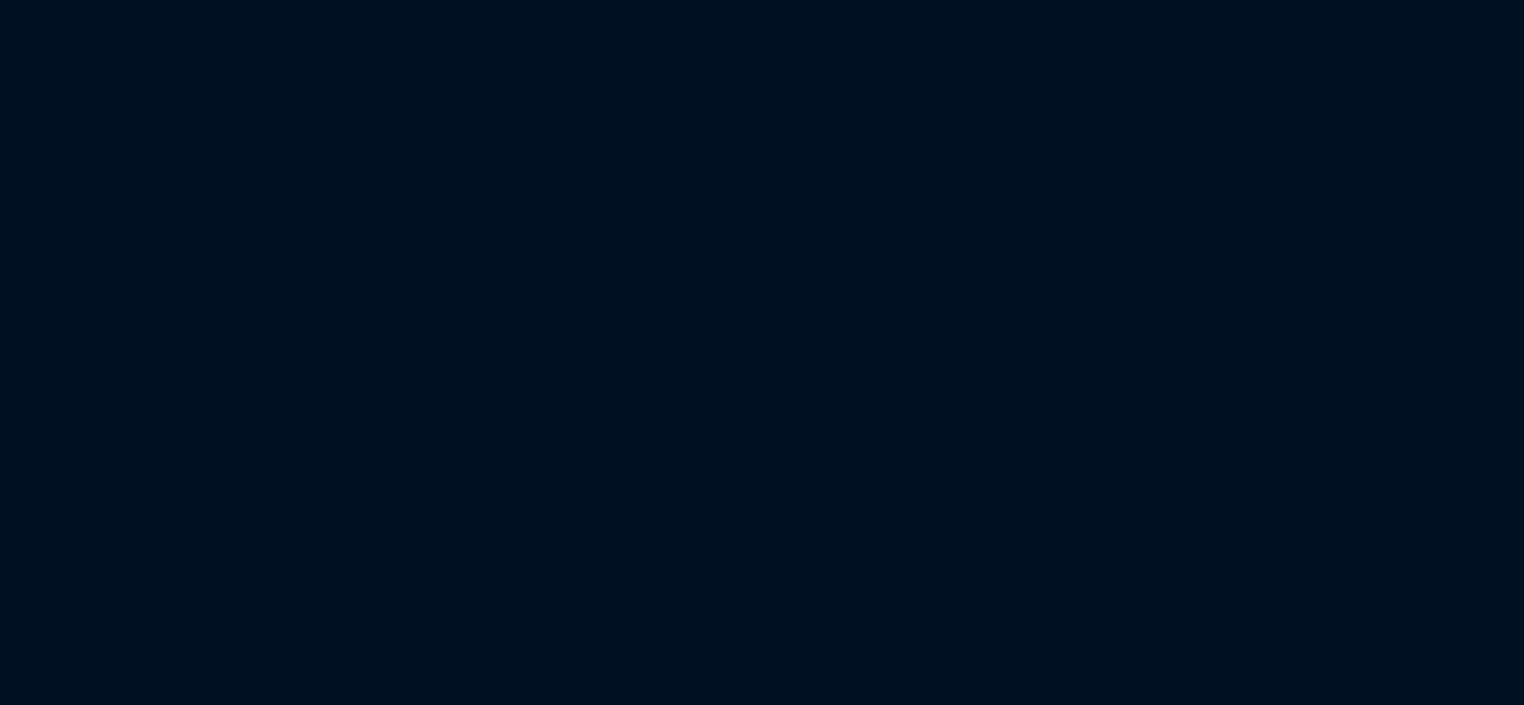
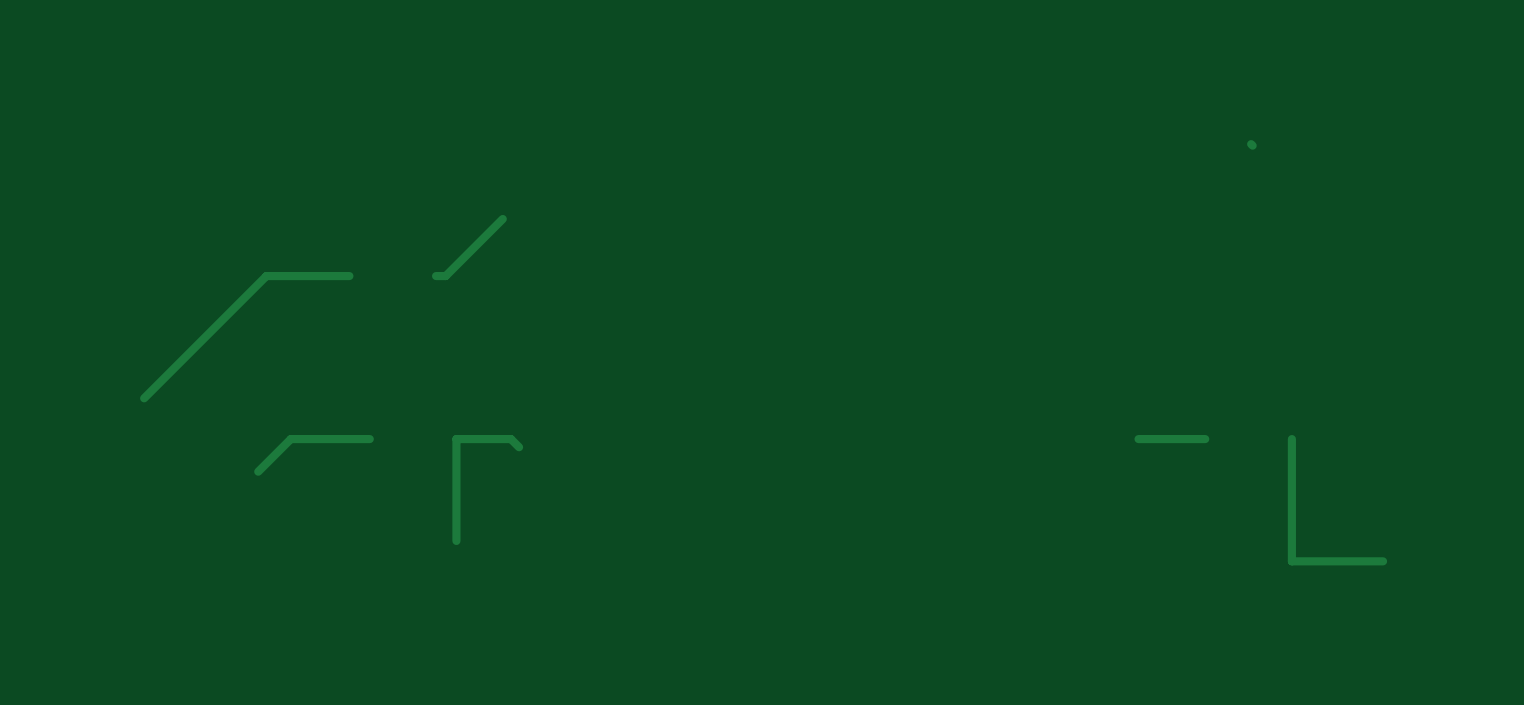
track: none -> (1251, 144) (1252, 145)
track: none -> (502, 219) (445, 276) (436, 276)
track: none -> (349, 276) (266, 276) (144, 398)
track: none -> (369, 439) (290, 439) (258, 471)
track: none -> (1205, 439) (1138, 439)
track: none -> (1291, 439) (1291, 561) (1383, 561)
track: none -> (519, 447) (510, 439) (456, 439) (456, 540)

